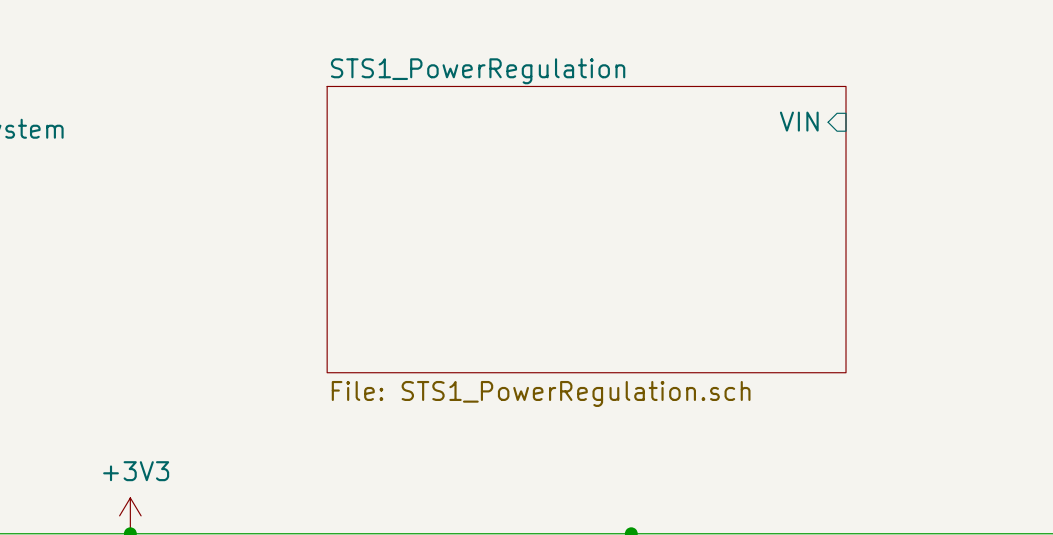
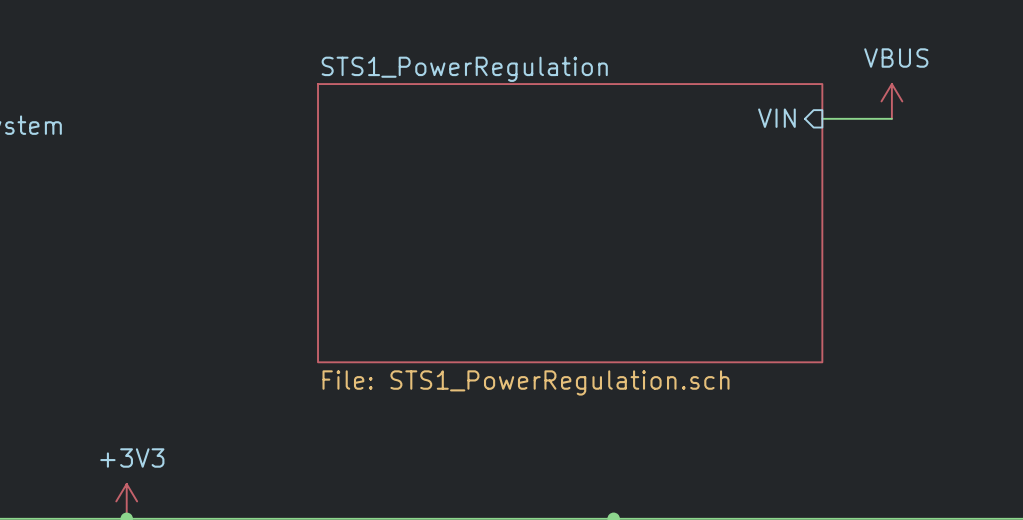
power symbol: none -> VBUS (891, 101)
wire: none -> (822, 118) (891, 118)

